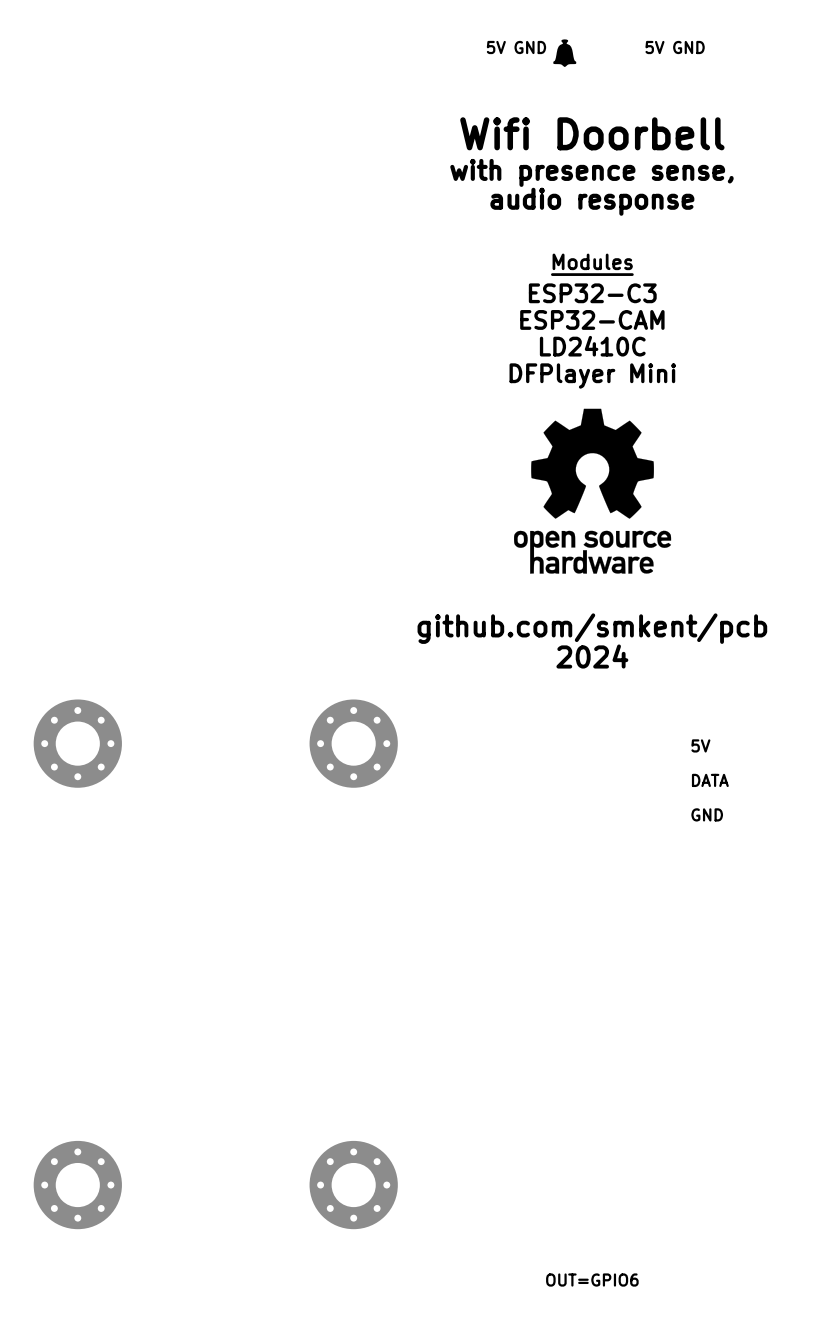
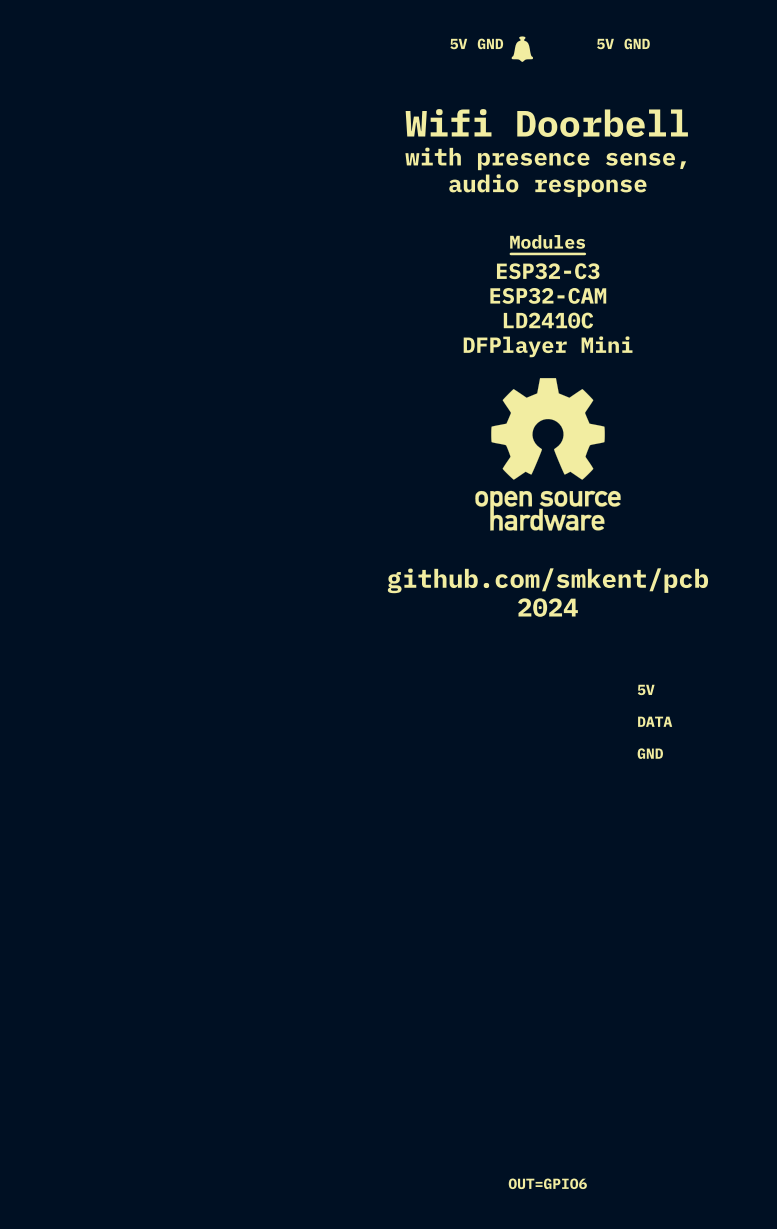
part: (77, 743) -> none
part: (353, 743) -> none
part: (77, 1185) -> none
part: (353, 1185) -> none

